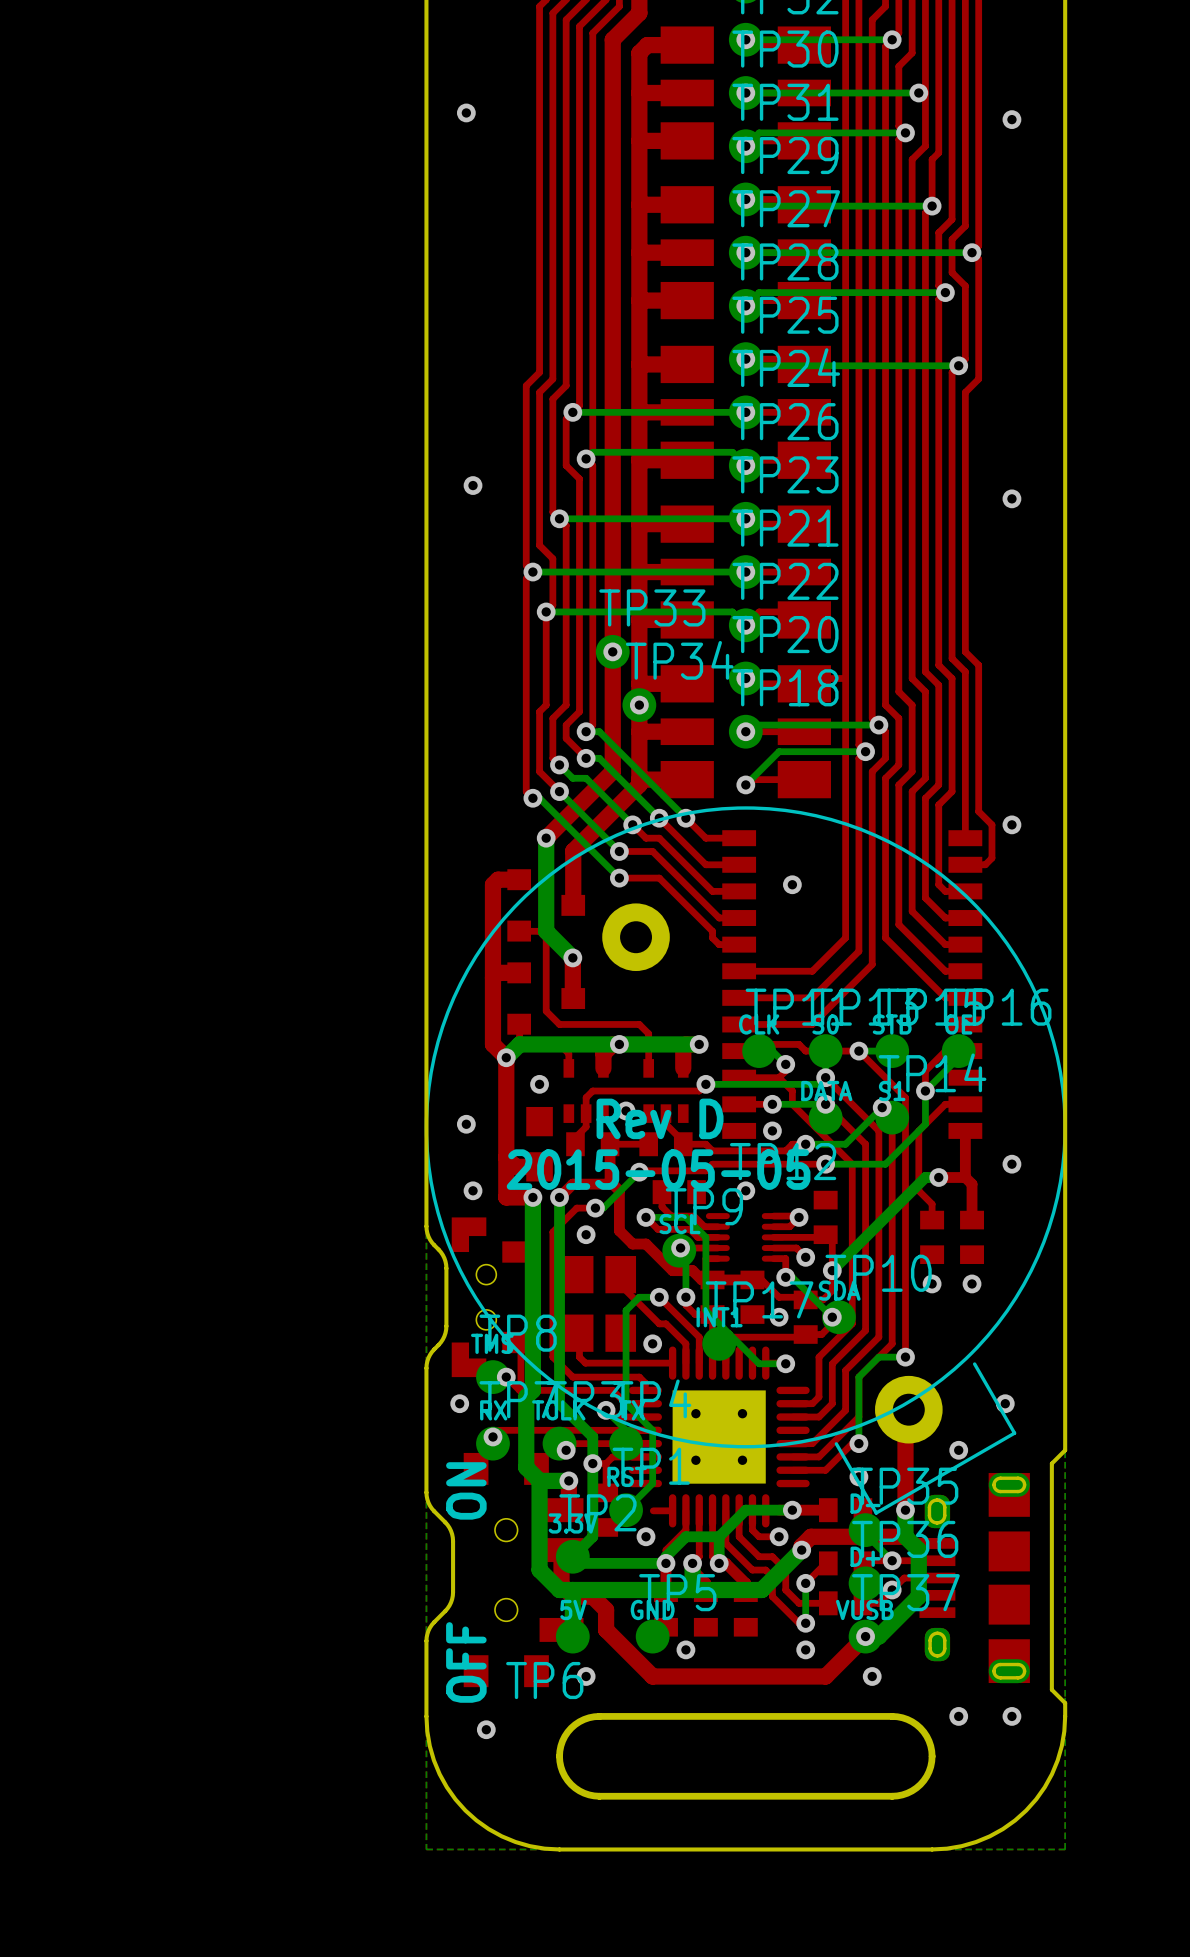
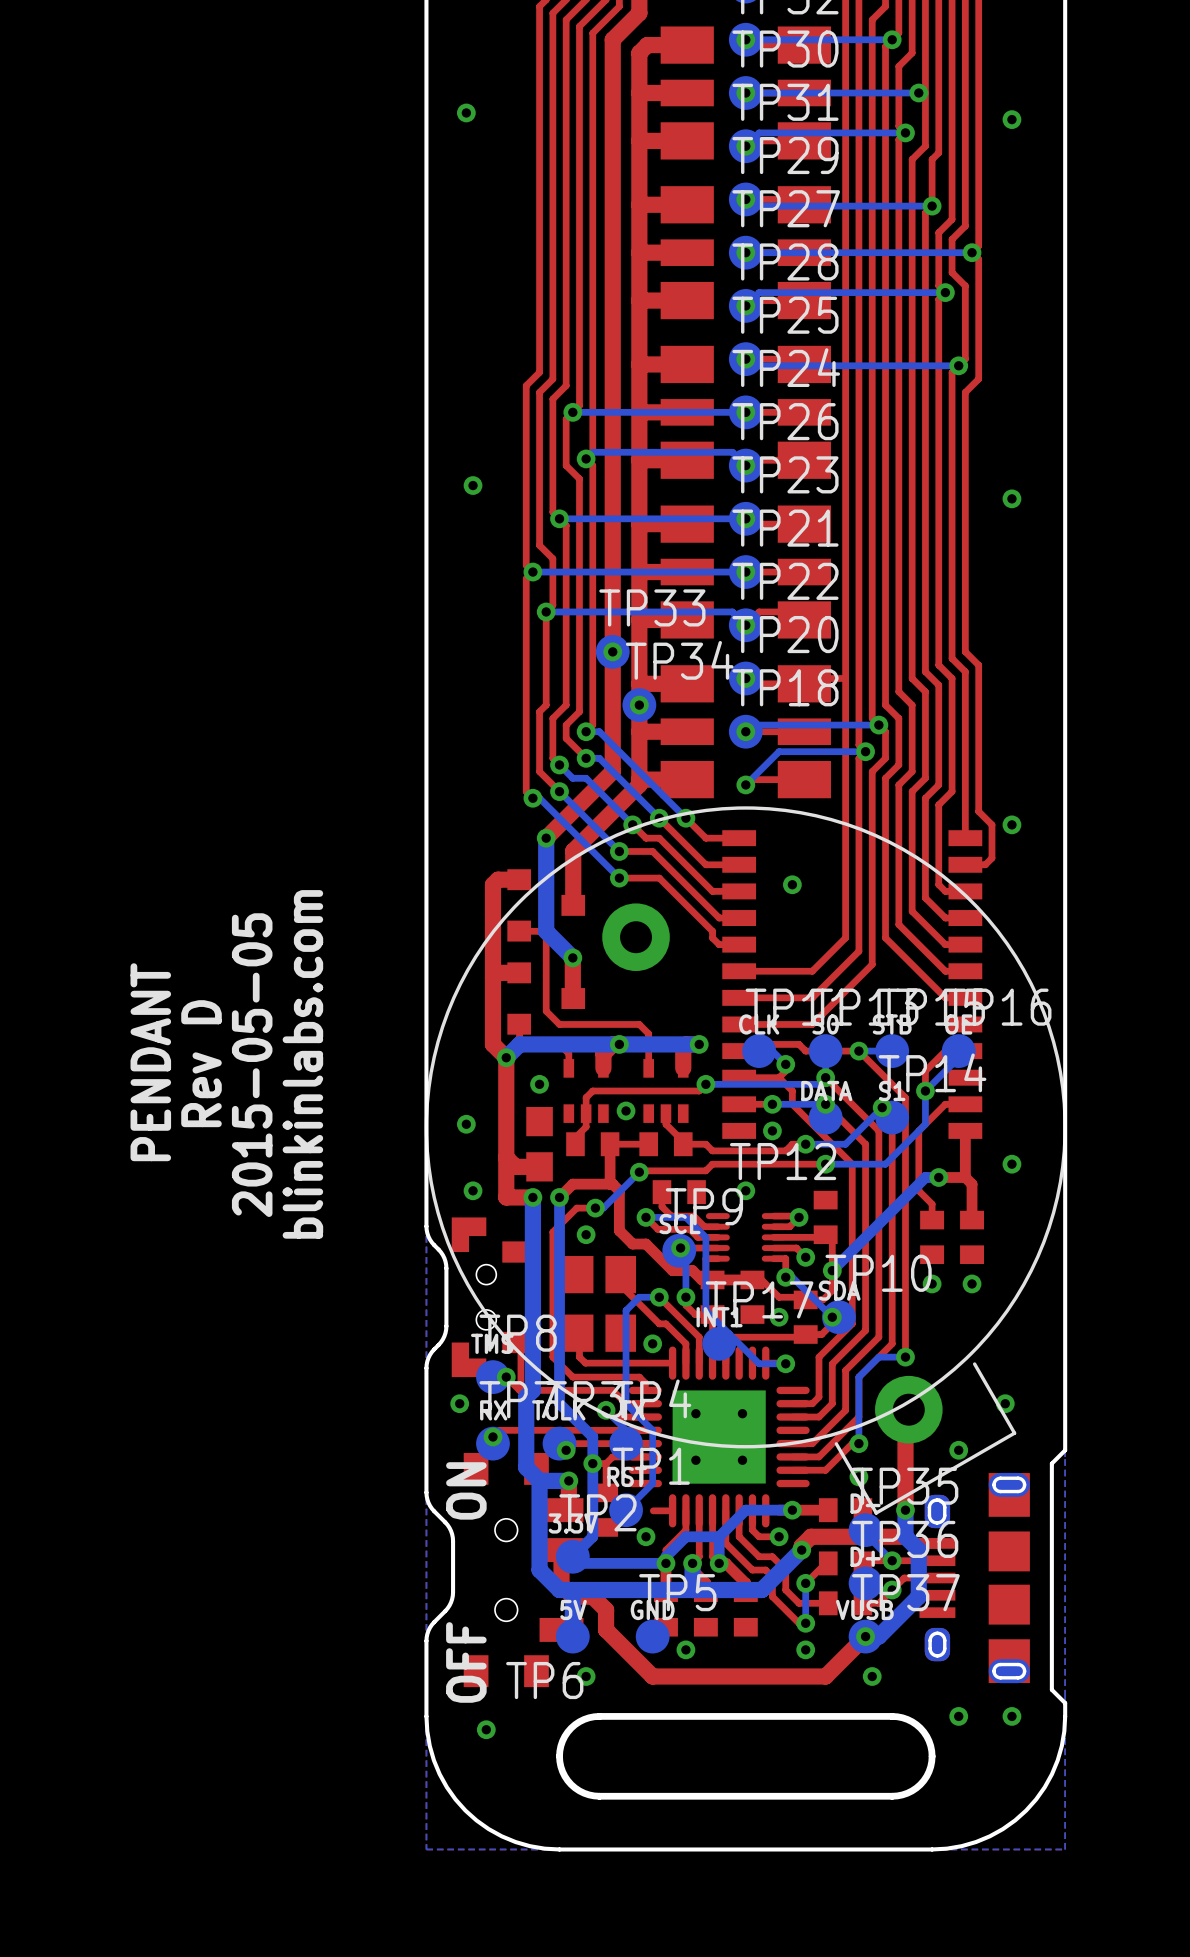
text: none -> PENDANT (150, 1062)
text: none -> blinkinlabs.com (302, 1064)
text rotation: 0° (660, 1118) -> 90° counterclockwise (201, 1063)
text position: Rev D (660, 1118) -> Rev D (201, 1063)
text rotation: 0° (658, 1169) -> 90° counterclockwise (252, 1065)
text position: 2015-05-05 (658, 1169) -> 2015-05-05 (252, 1065)

